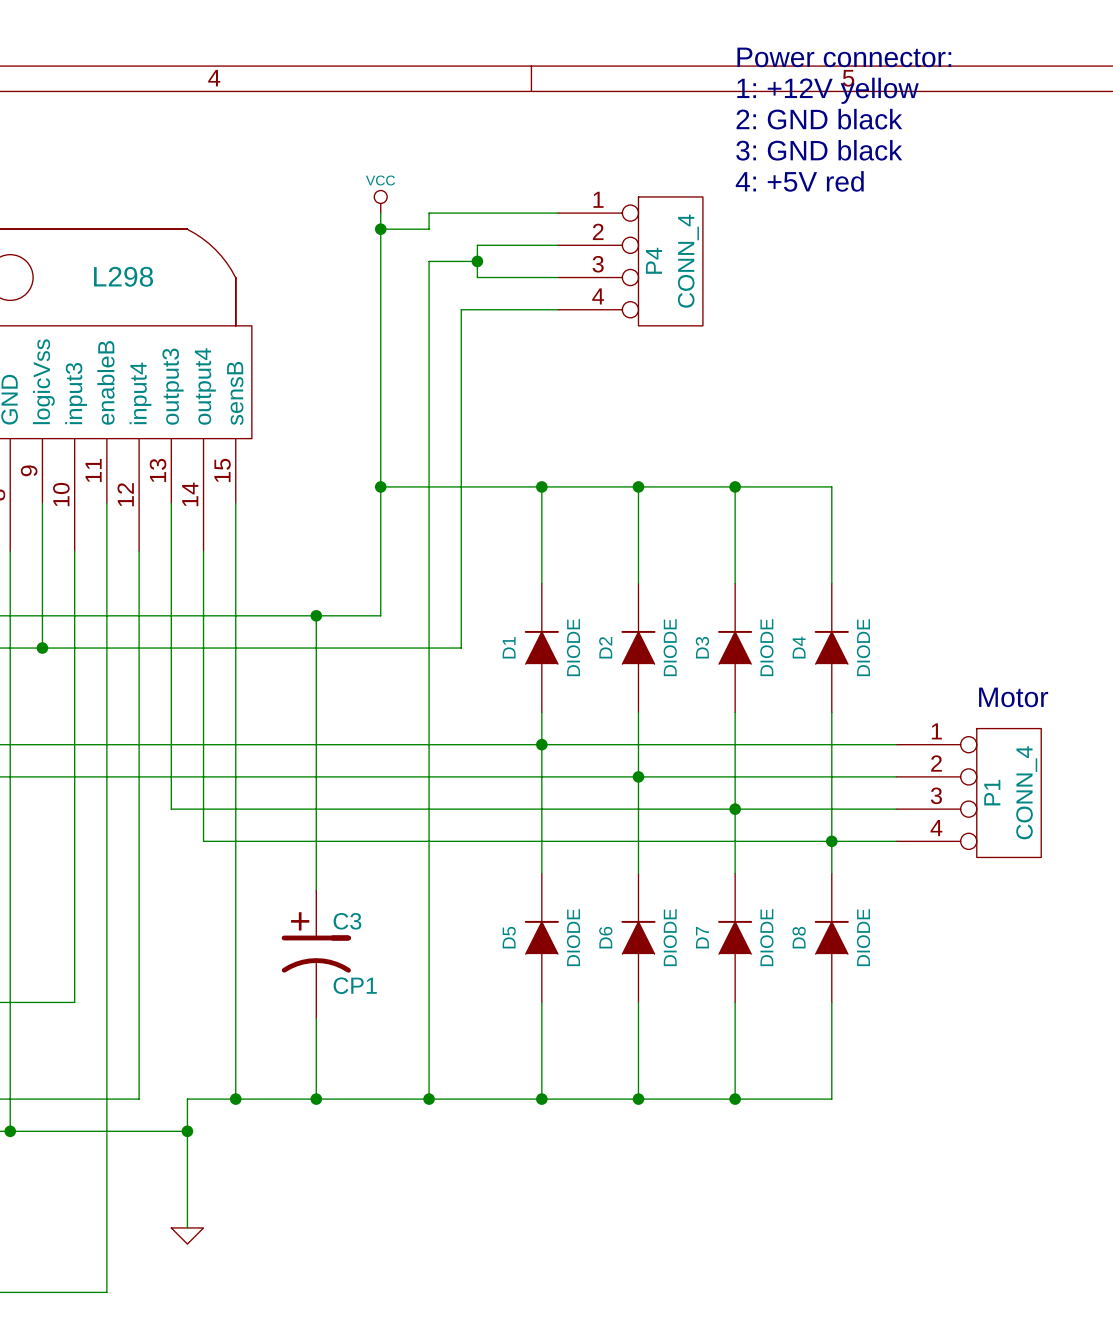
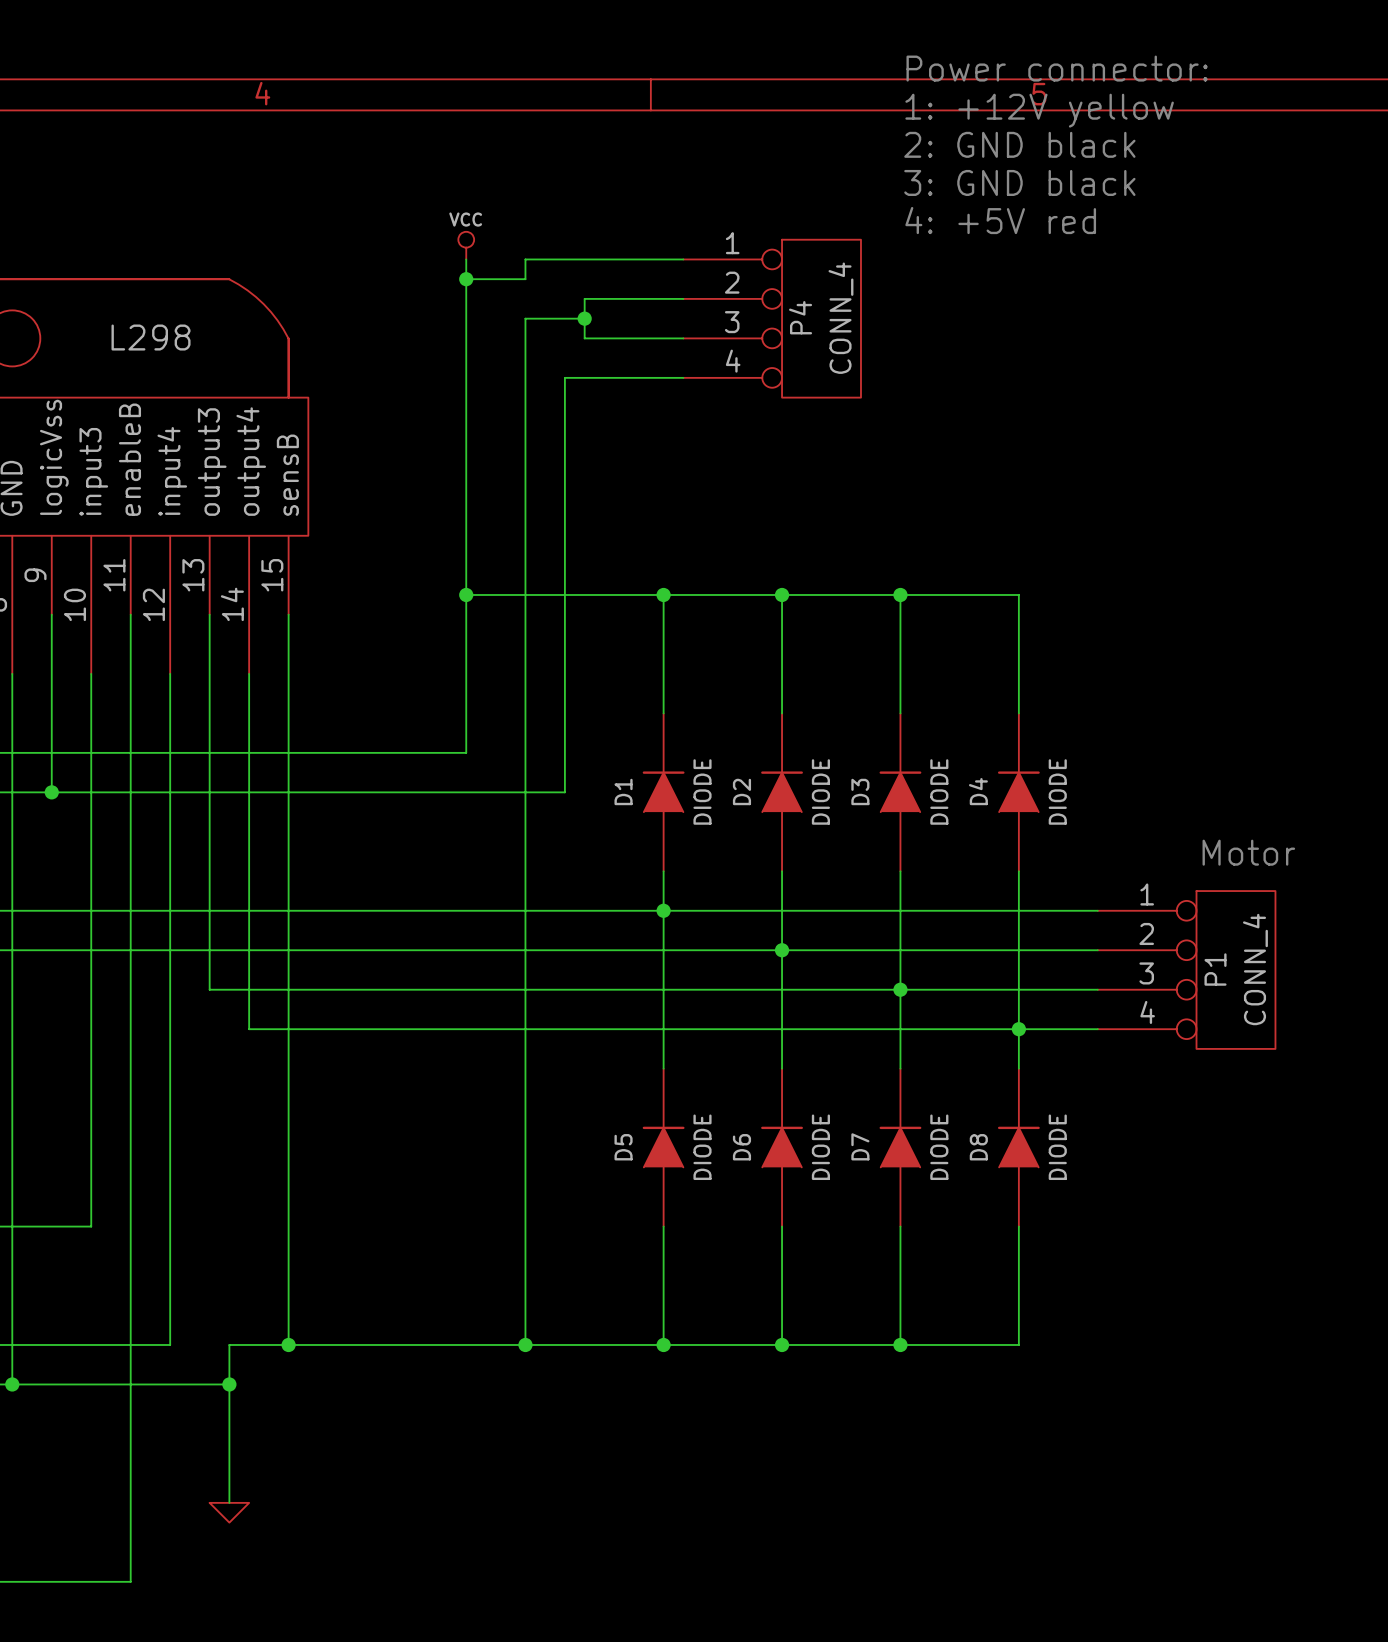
wire: (316, 615) (316, 889) -> none
junction: (316, 615) -> none
C3: CP1 (316, 954) -> none
wire: (316, 1018) (316, 1099) -> none
junction: (316, 1099) -> none

